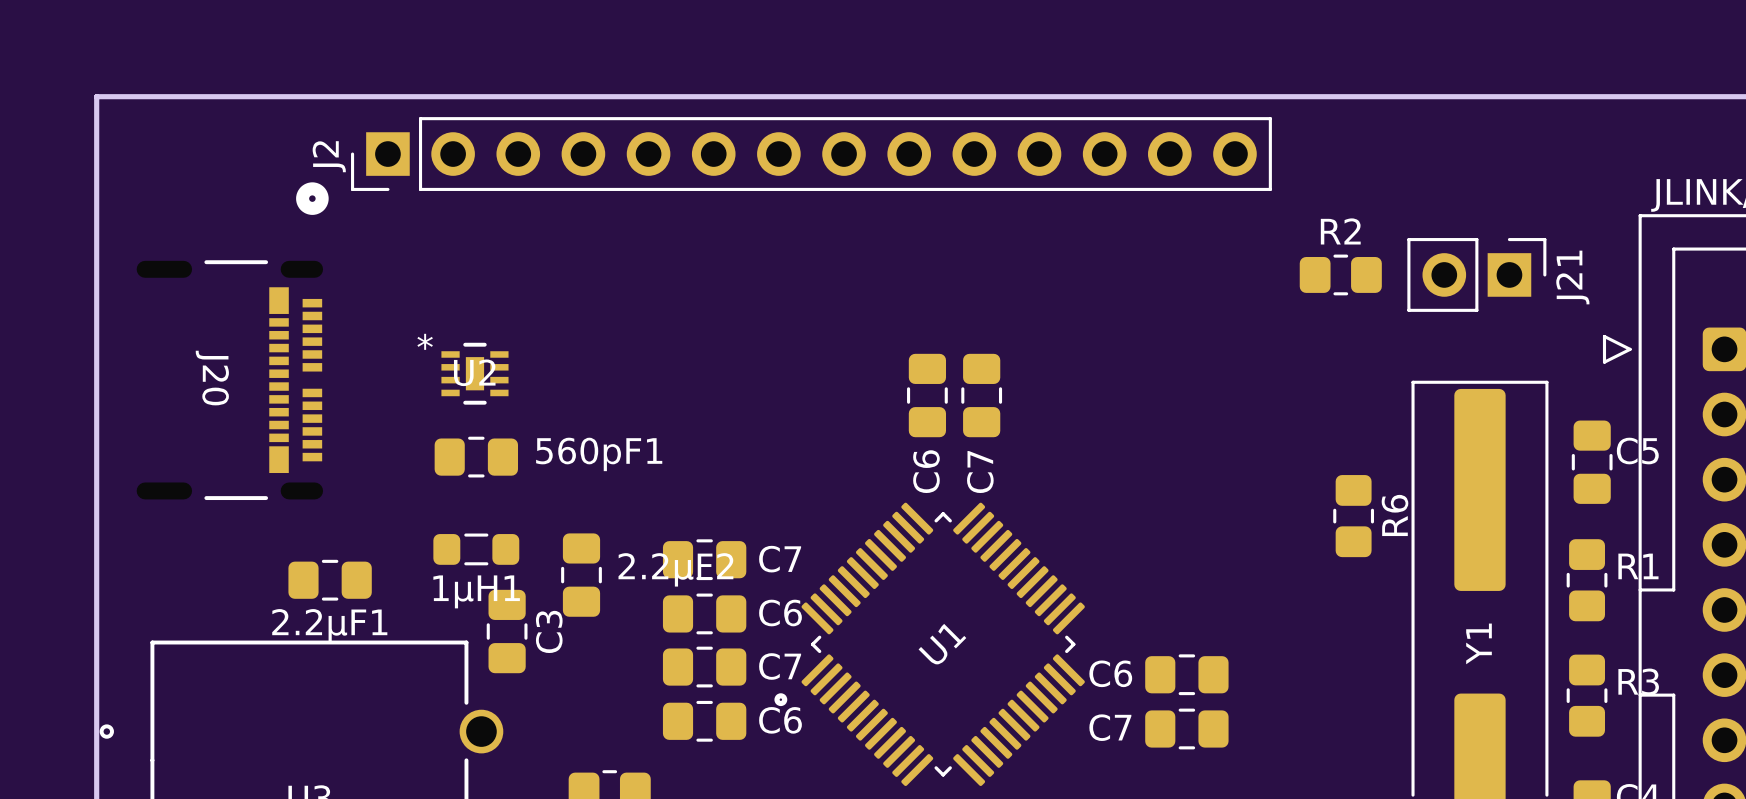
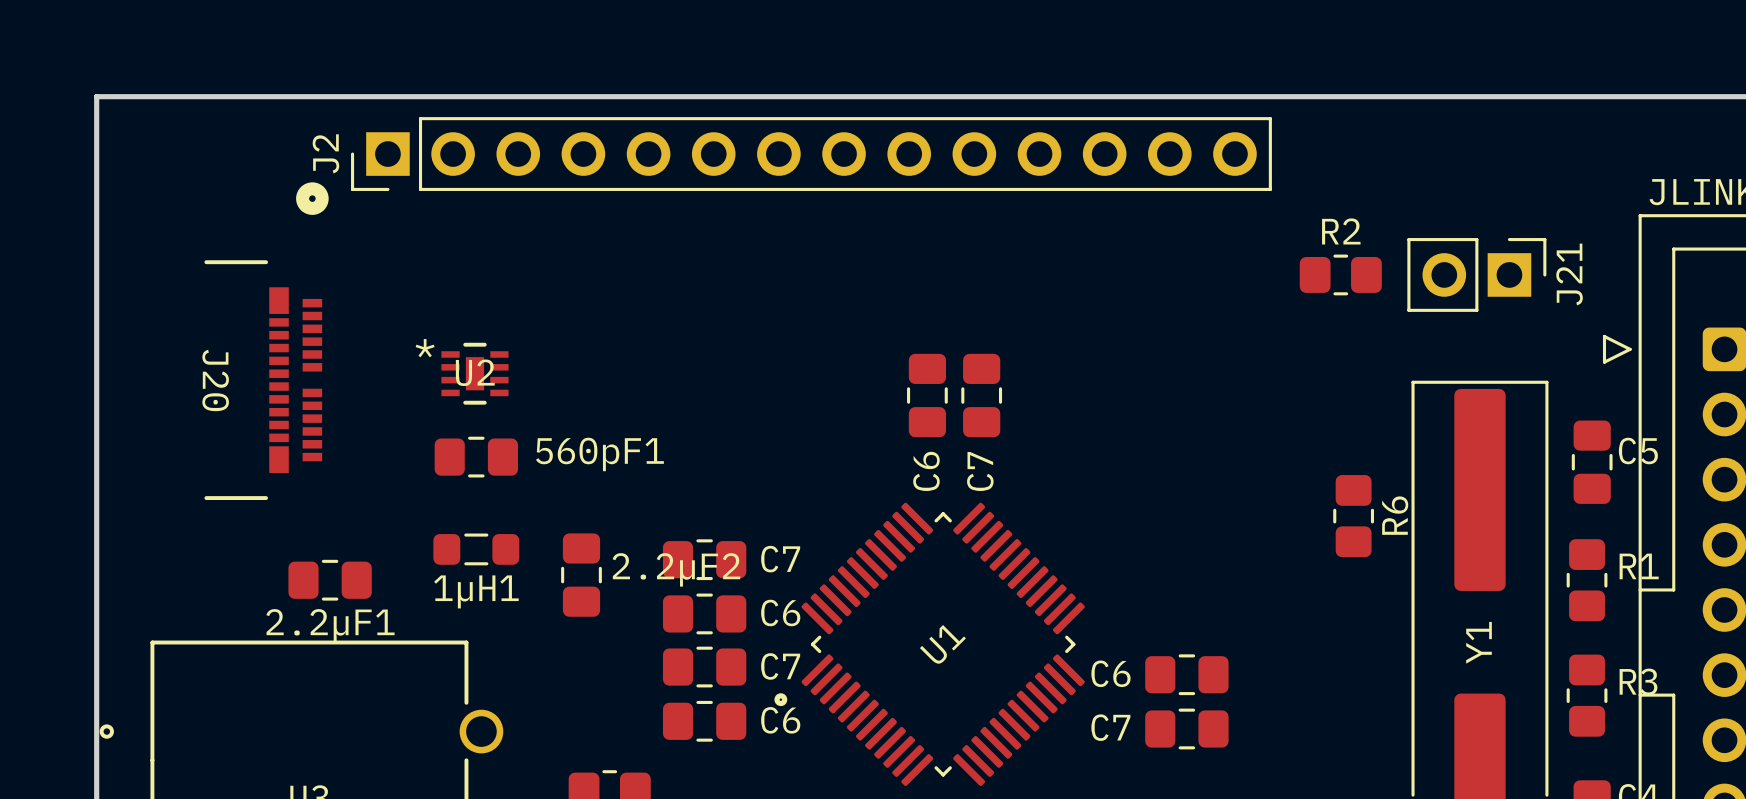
C3: (507, 631) -> none

